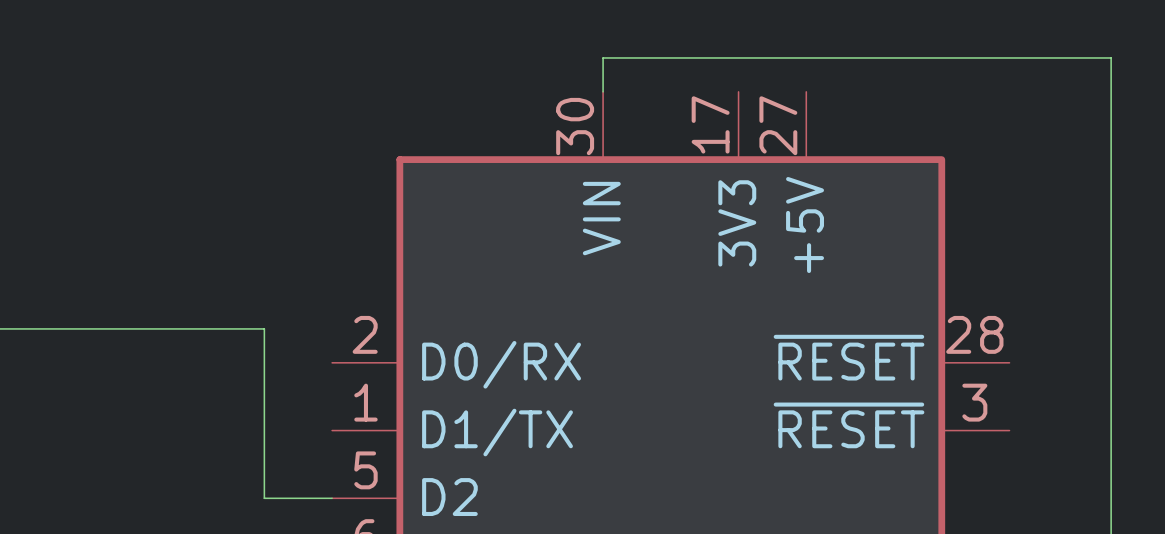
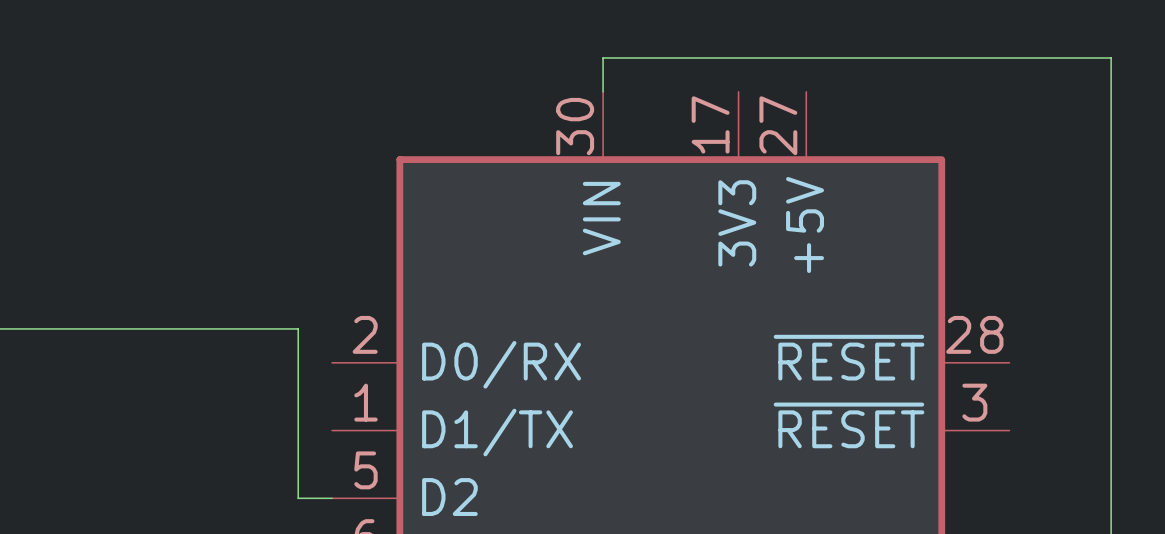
wire: (264, 328) (264, 498) (298, 498) -> (264, 328) (298, 328) (298, 498)

